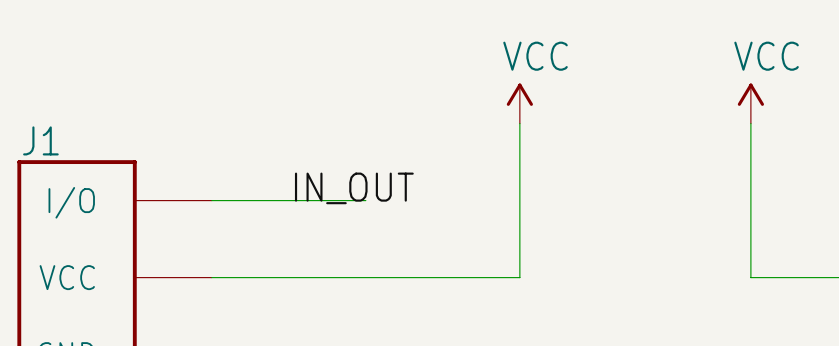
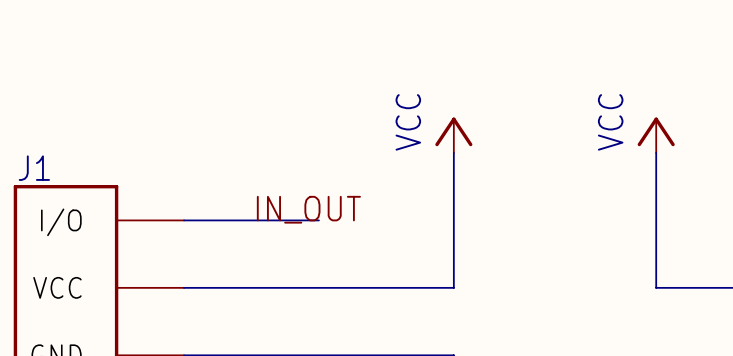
power symbol text rotation: 0° (535, 56) -> 90° counterclockwise (408, 122)
power symbol text rotation: 0° (766, 56) -> 90° counterclockwise (610, 122)
power symbol shape: [506, 83, 533, 124] -> [435, 117, 473, 153]
power symbol shape: [737, 83, 764, 124] -> [637, 117, 675, 153]

